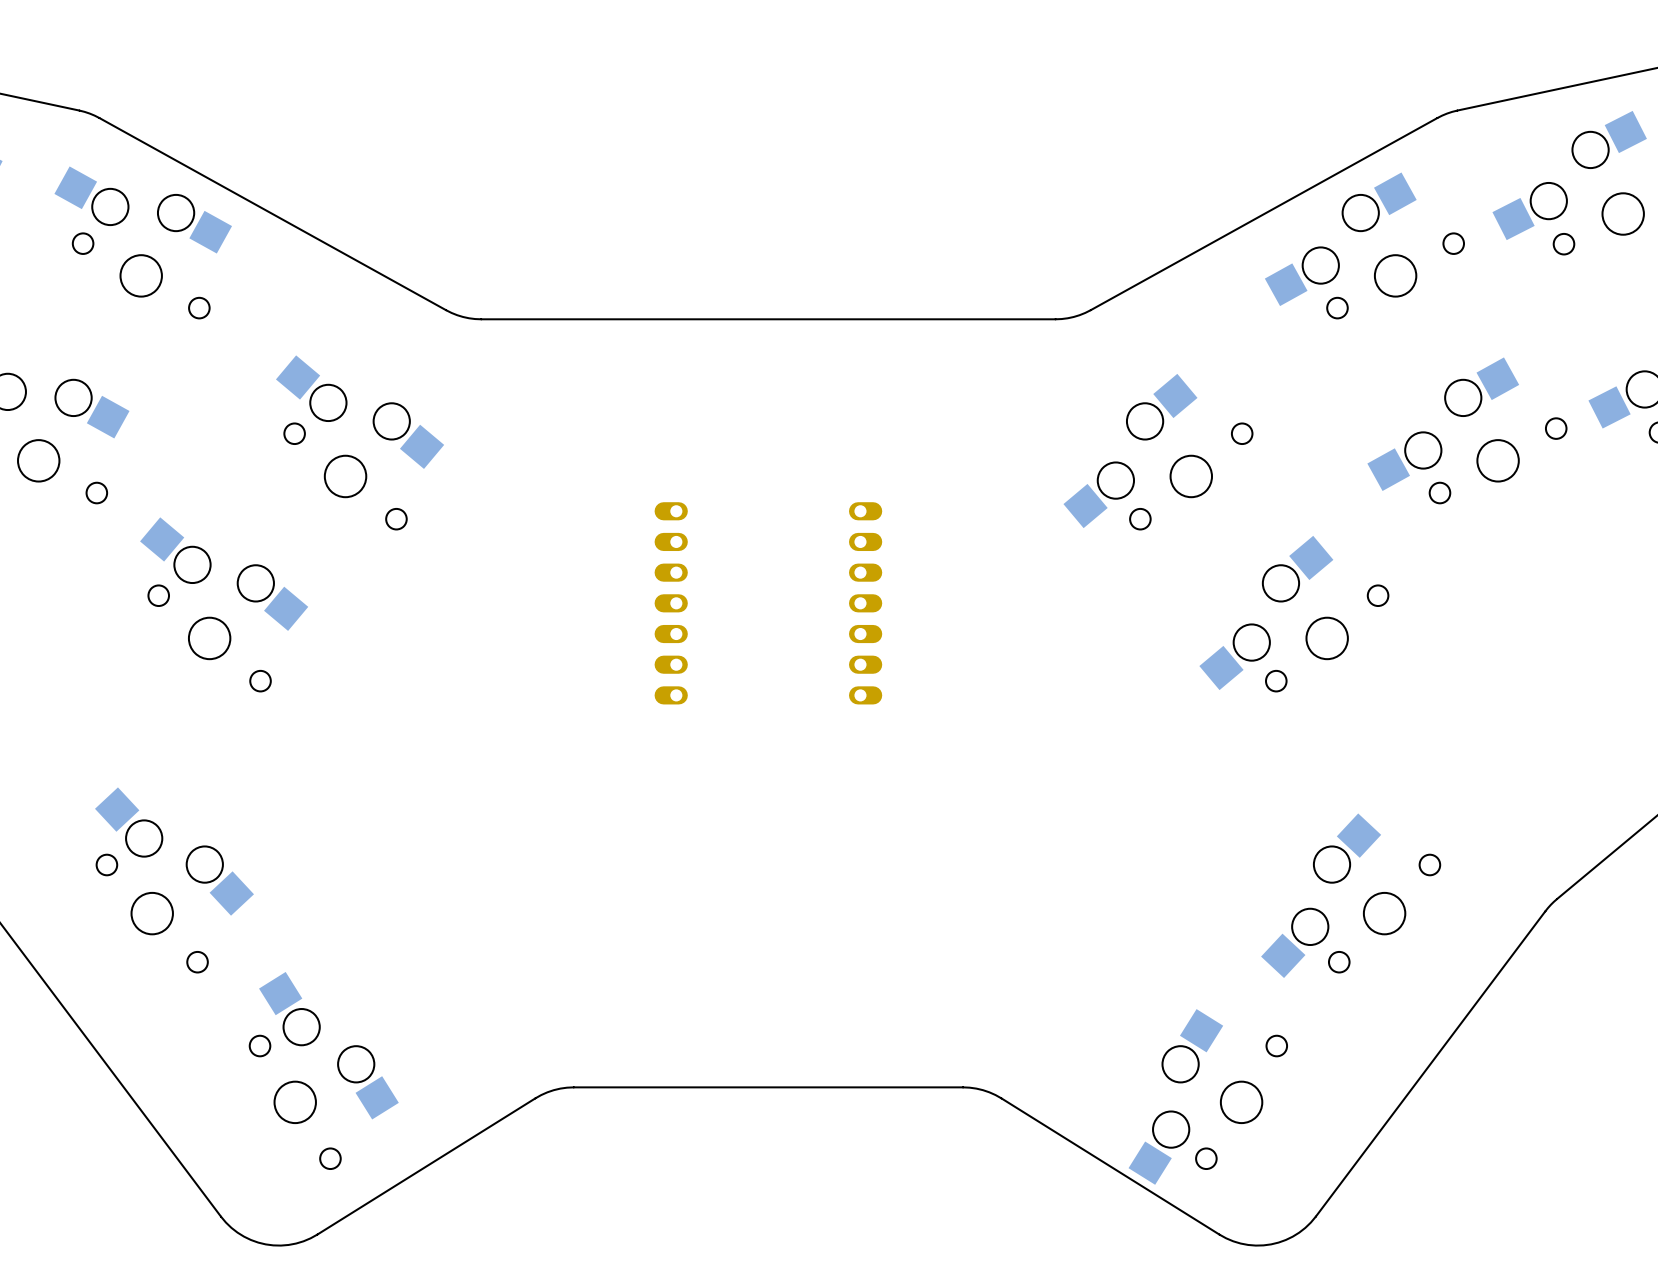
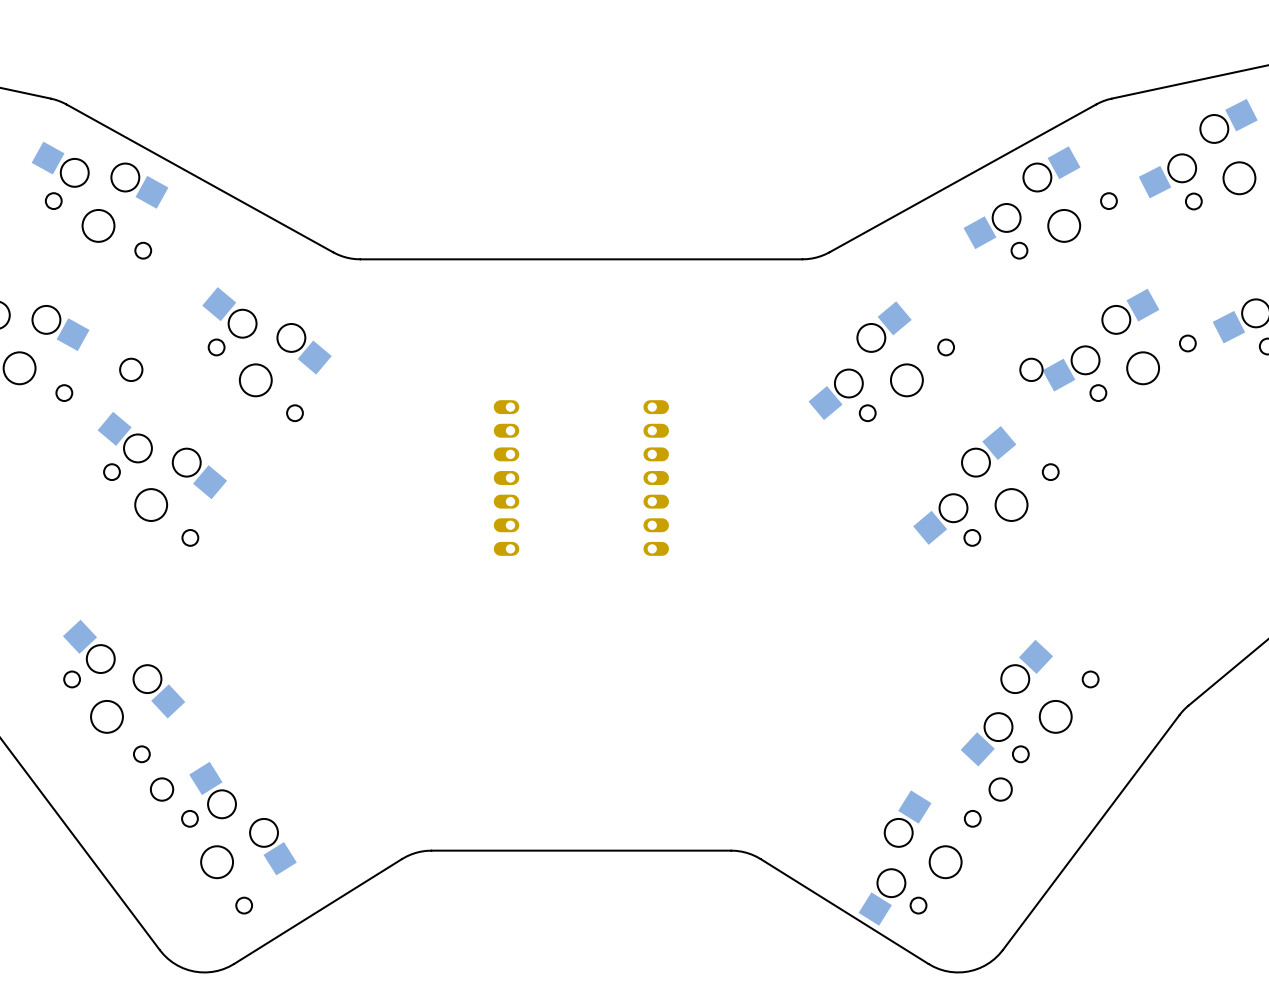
round board edge: none -> [119, 358, 144, 382]
round board edge: none -> [1019, 358, 1044, 382]
round board edge: none -> [150, 777, 174, 802]
round board edge: none -> [988, 777, 1013, 802]

